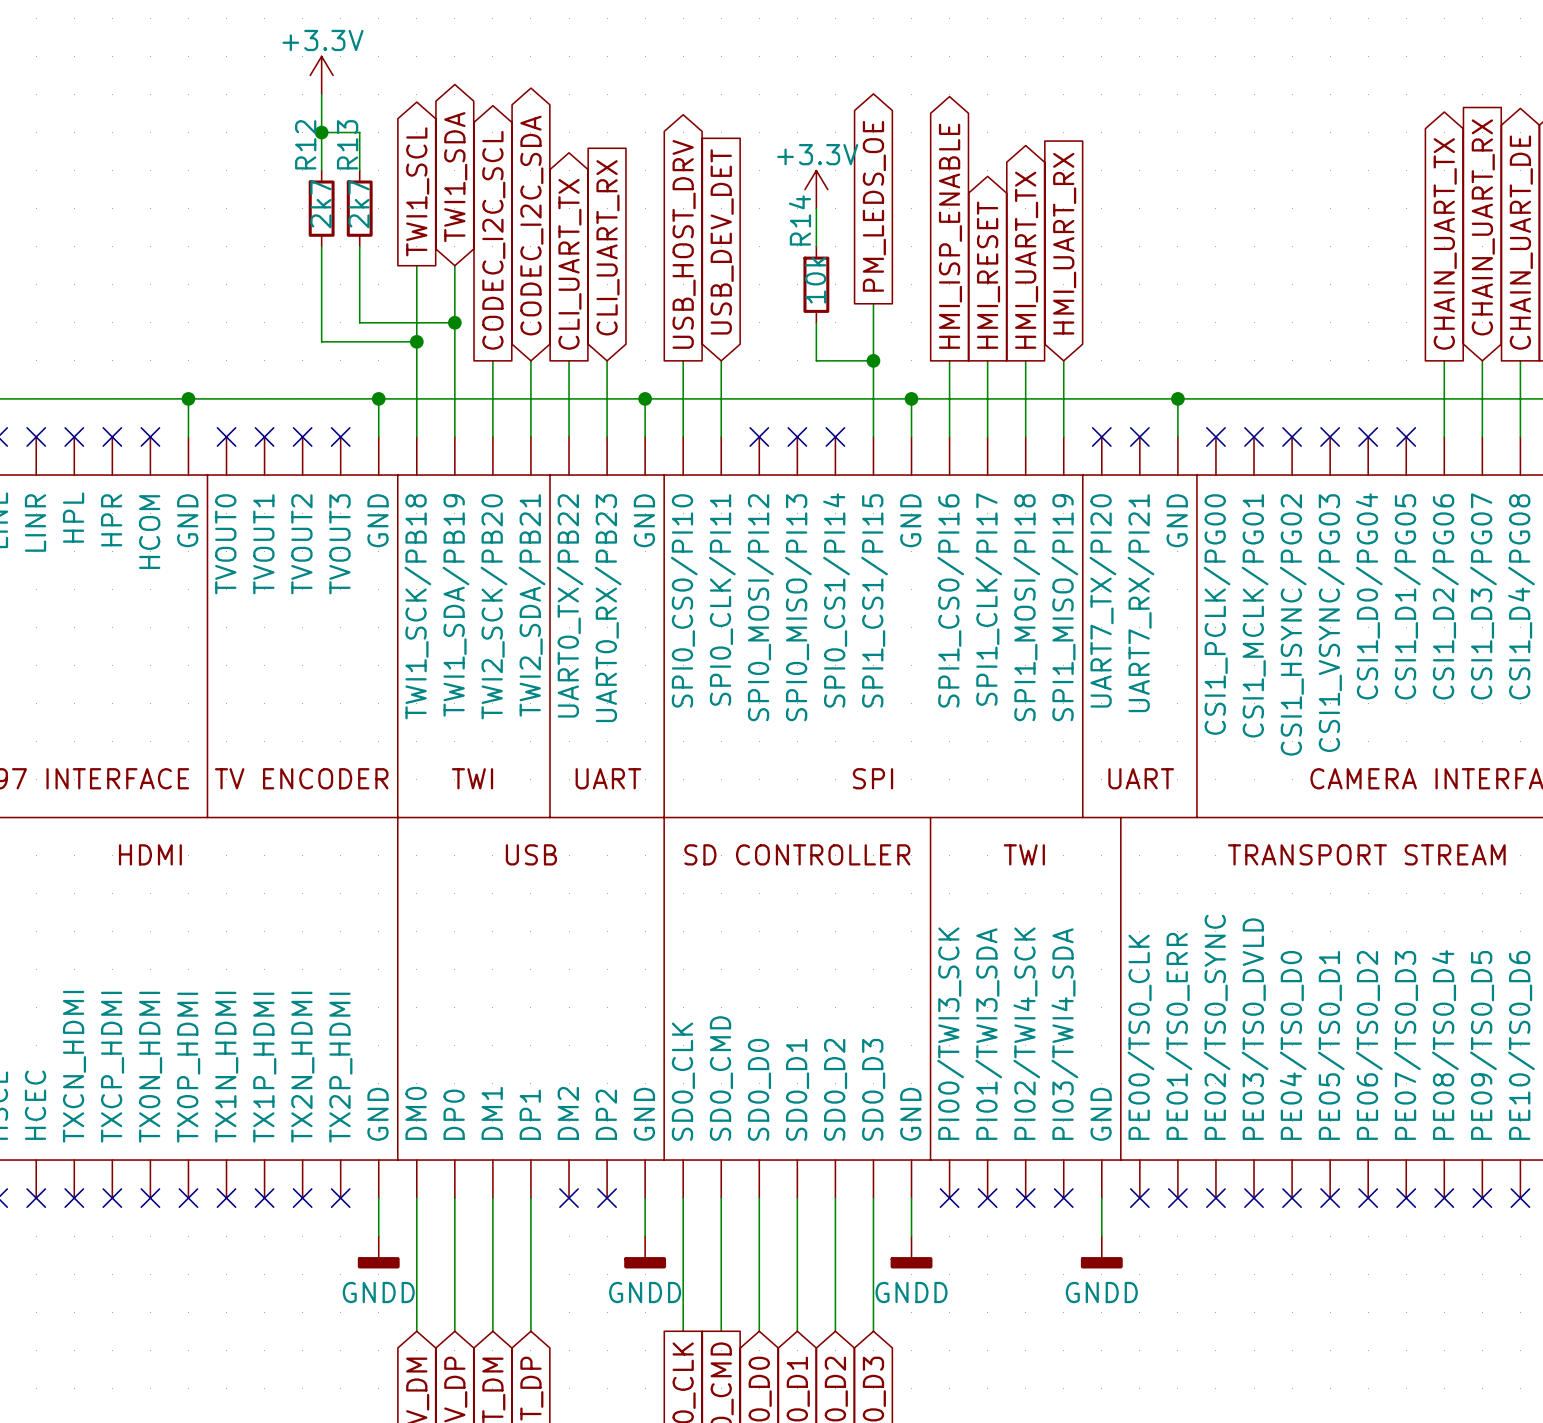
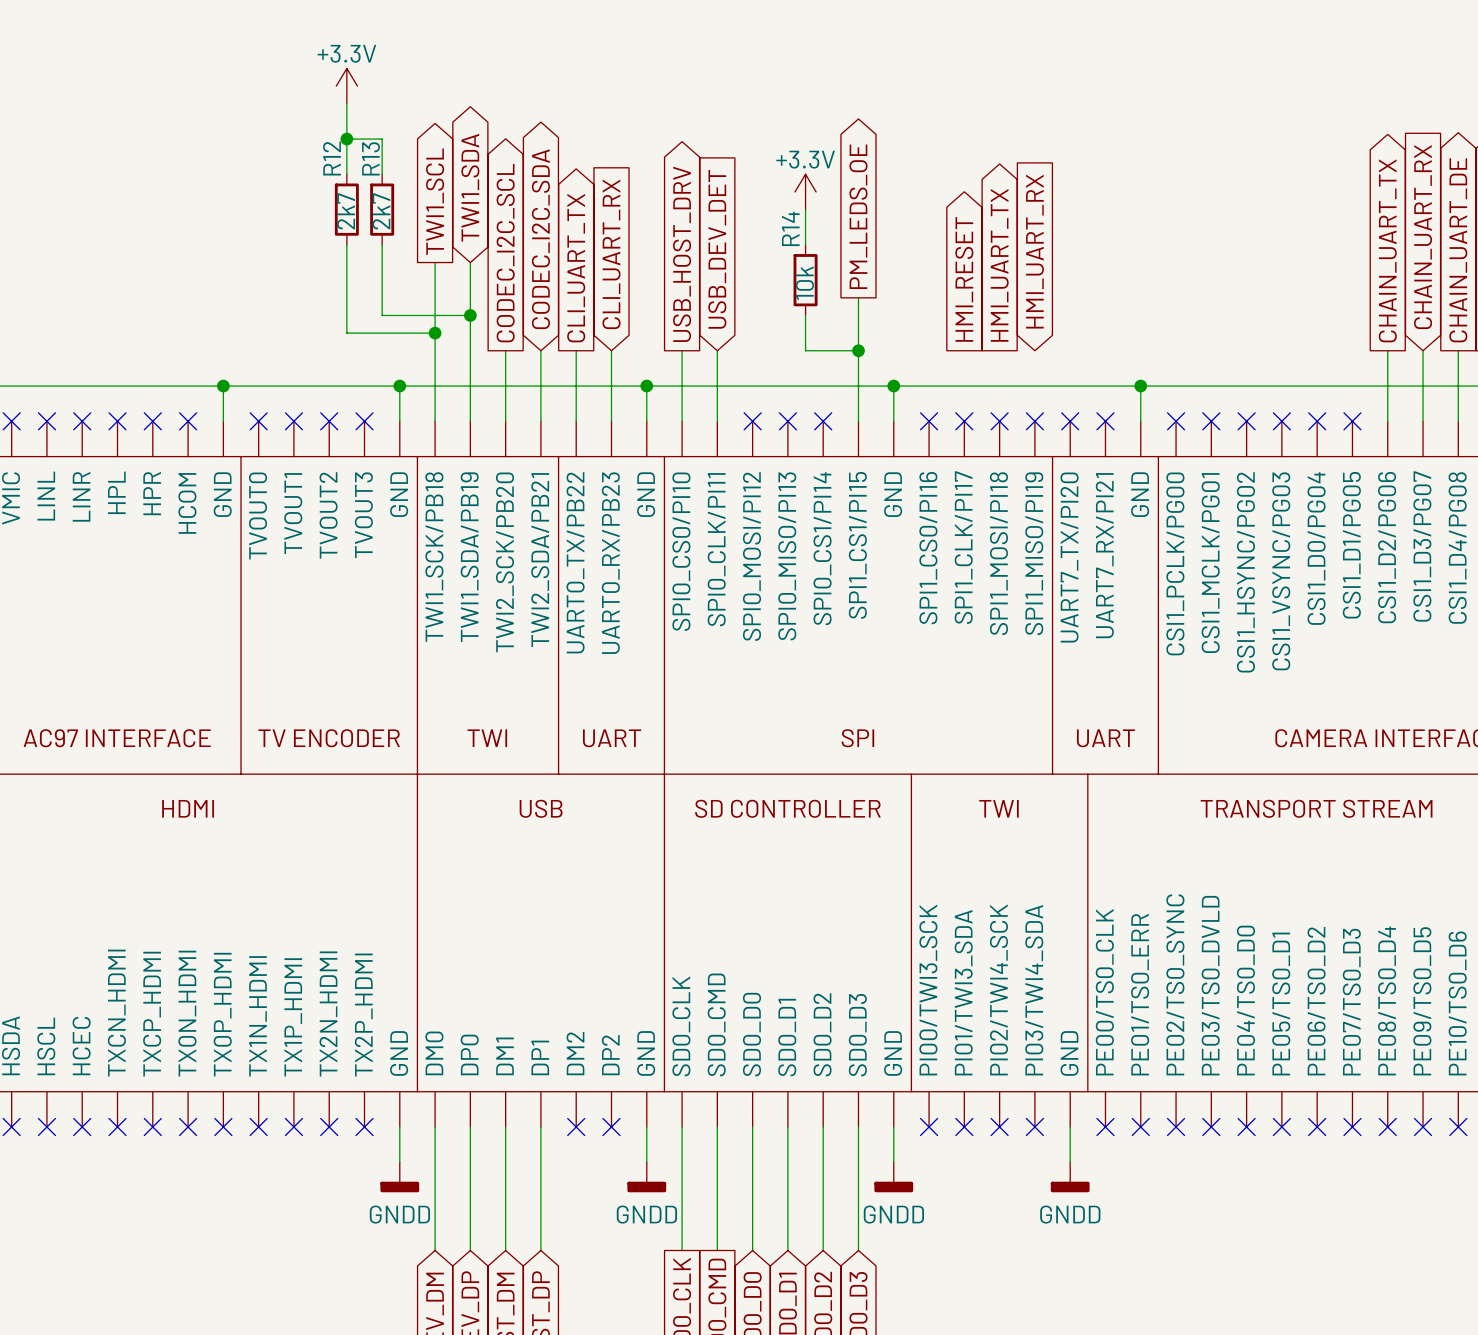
global label: HMI_ISP_ENABLE (950, 236) -> none
wire: (949, 360) (949, 436) -> none
wire: (987, 360) (987, 436) -> none
wire: (1025, 360) (1025, 436) -> none
wire: (1063, 360) (1063, 436) -> none
no-connect mark: none -> (929, 421)
no-connect mark: none -> (964, 421)
no-connect mark: none -> (999, 421)
no-connect mark: none -> (1034, 421)

